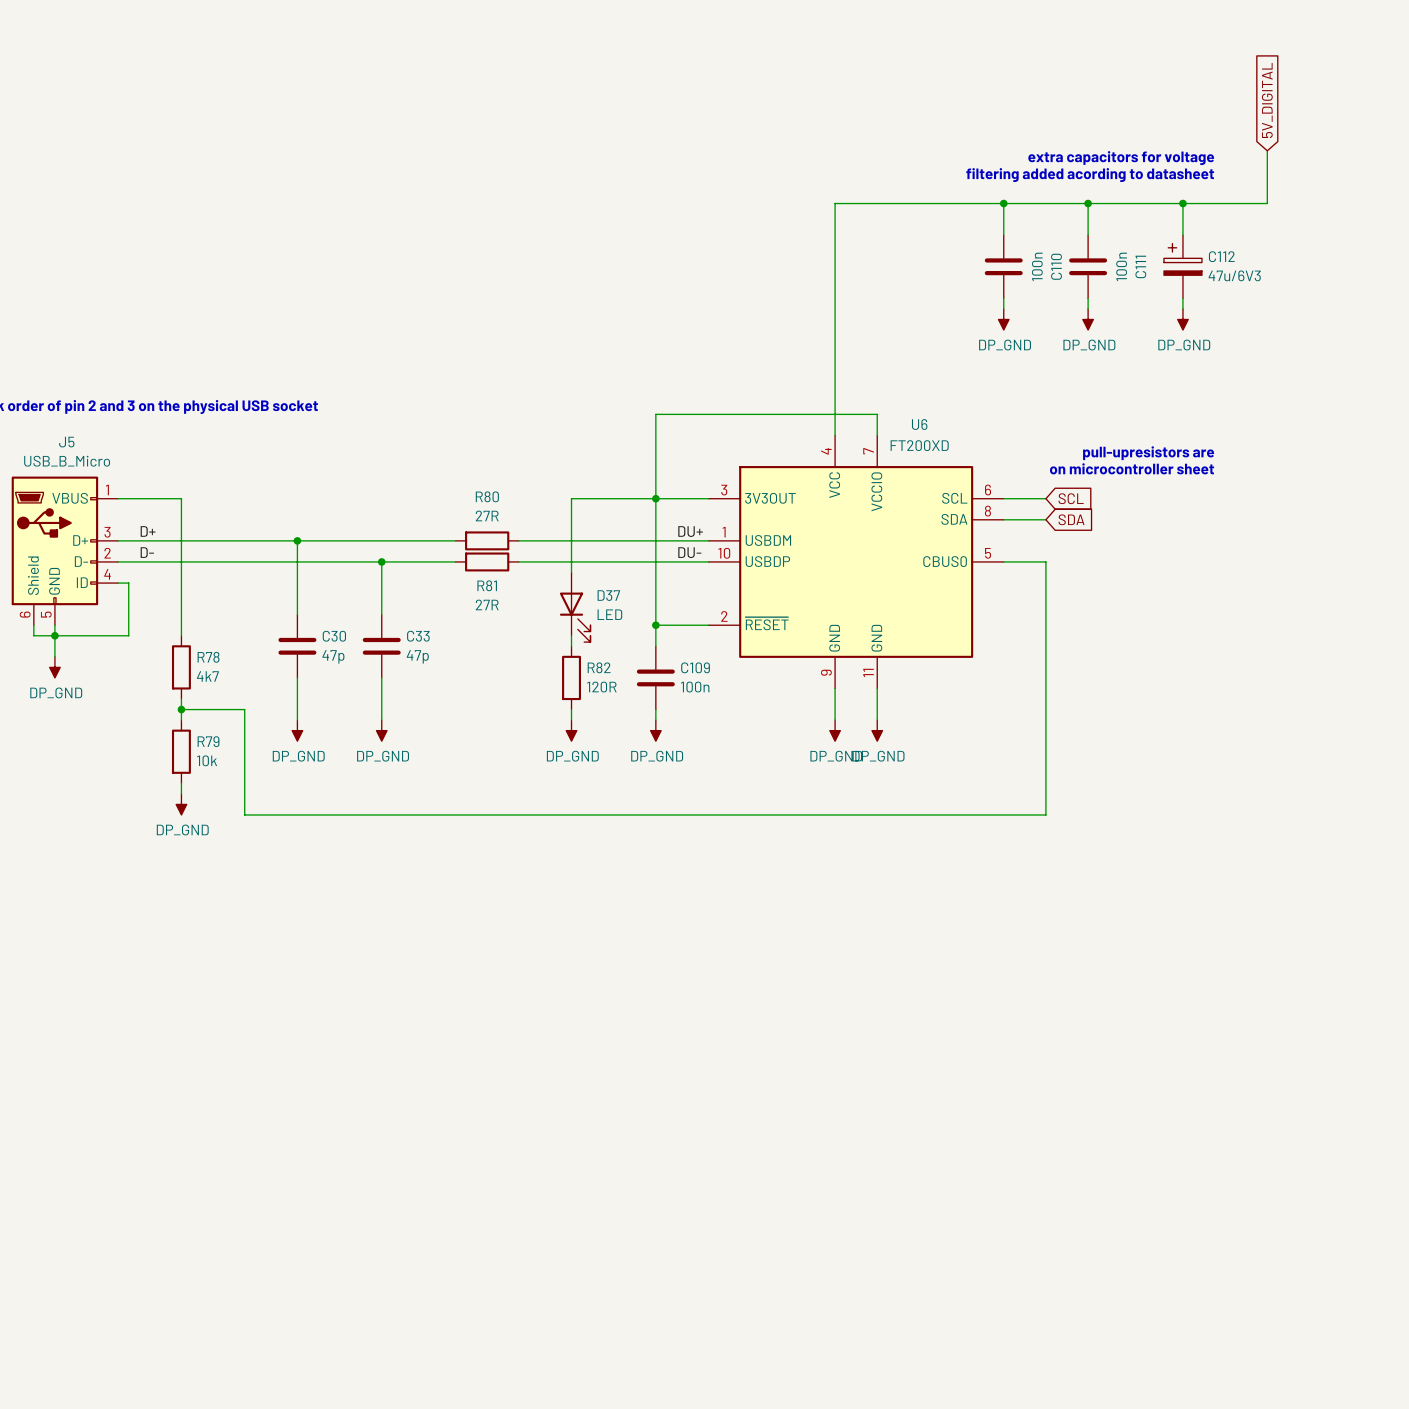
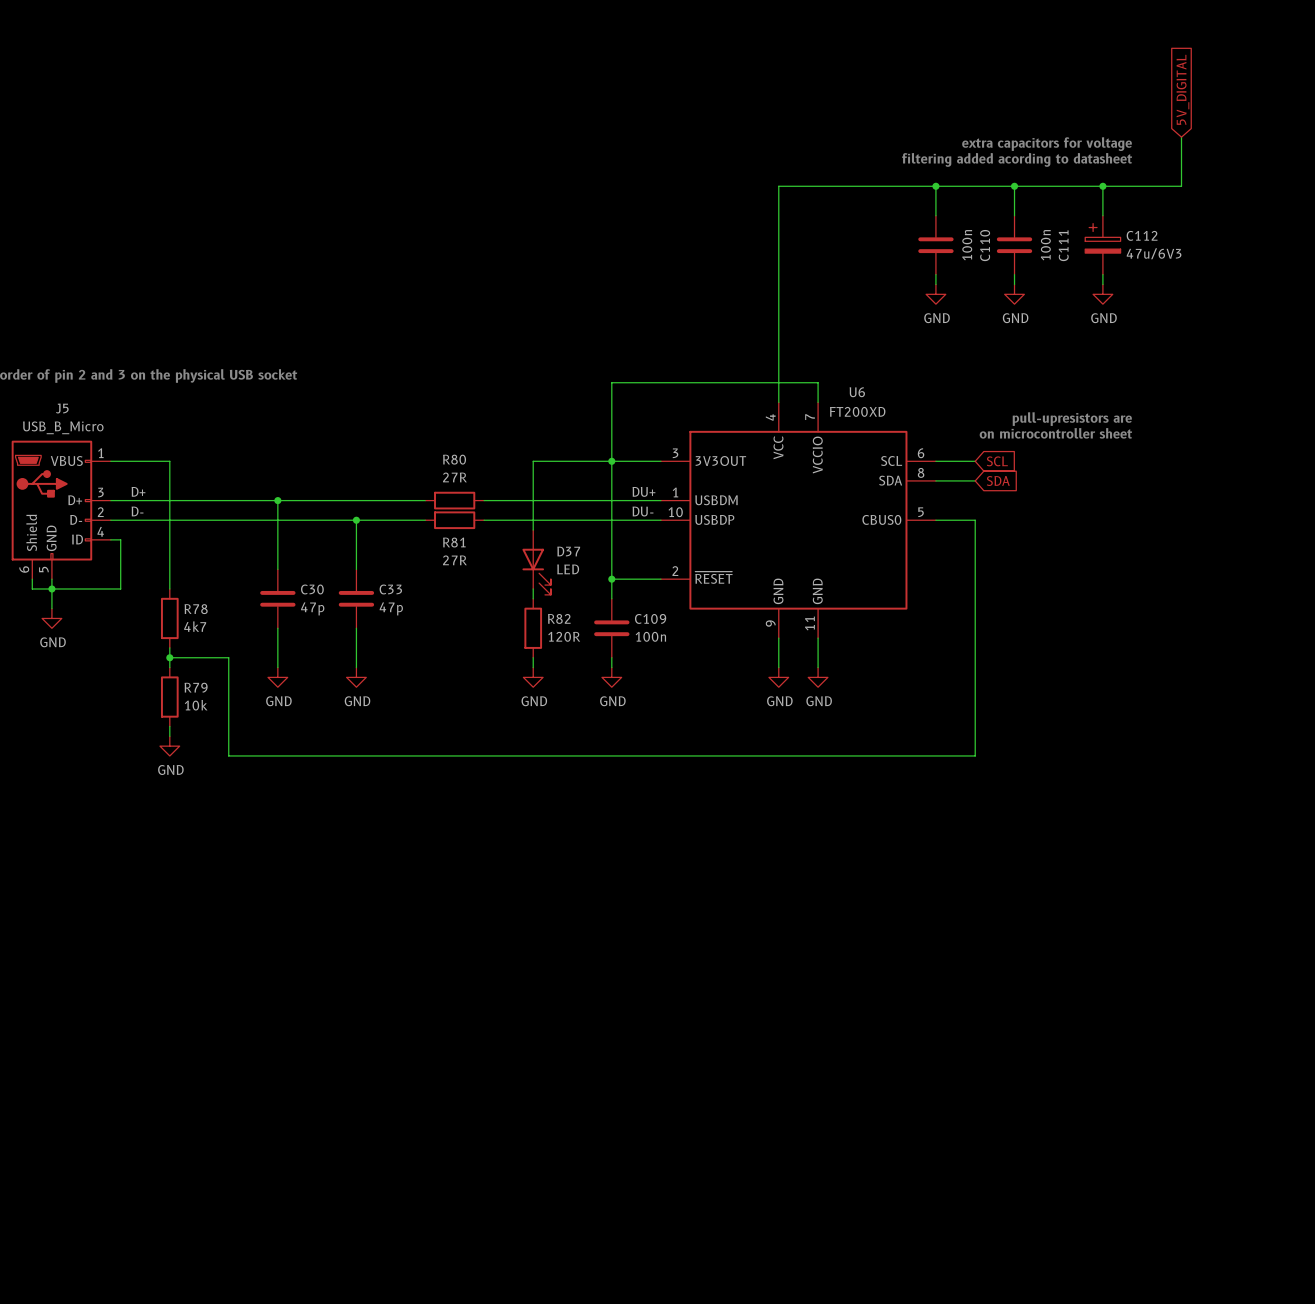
power symbol: DP_GND (1003, 319) -> GND (935, 294)
power symbol: DP_GND (1088, 319) -> GND (1014, 294)
power symbol: DP_GND (1182, 319) -> GND (1102, 294)
power symbol: DP_GND (54, 667) -> GND (51, 618)
power symbol: DP_GND (297, 730) -> GND (277, 677)
power symbol: DP_GND (381, 730) -> GND (356, 677)
power symbol: DP_GND (571, 730) -> GND (533, 677)
power symbol: DP_GND (655, 730) -> GND (611, 677)
power symbol: DP_GND (835, 730) -> GND (778, 677)
power symbol: DP_GND (877, 730) -> GND (818, 677)
power symbol: DP_GND (181, 804) -> GND (169, 746)

